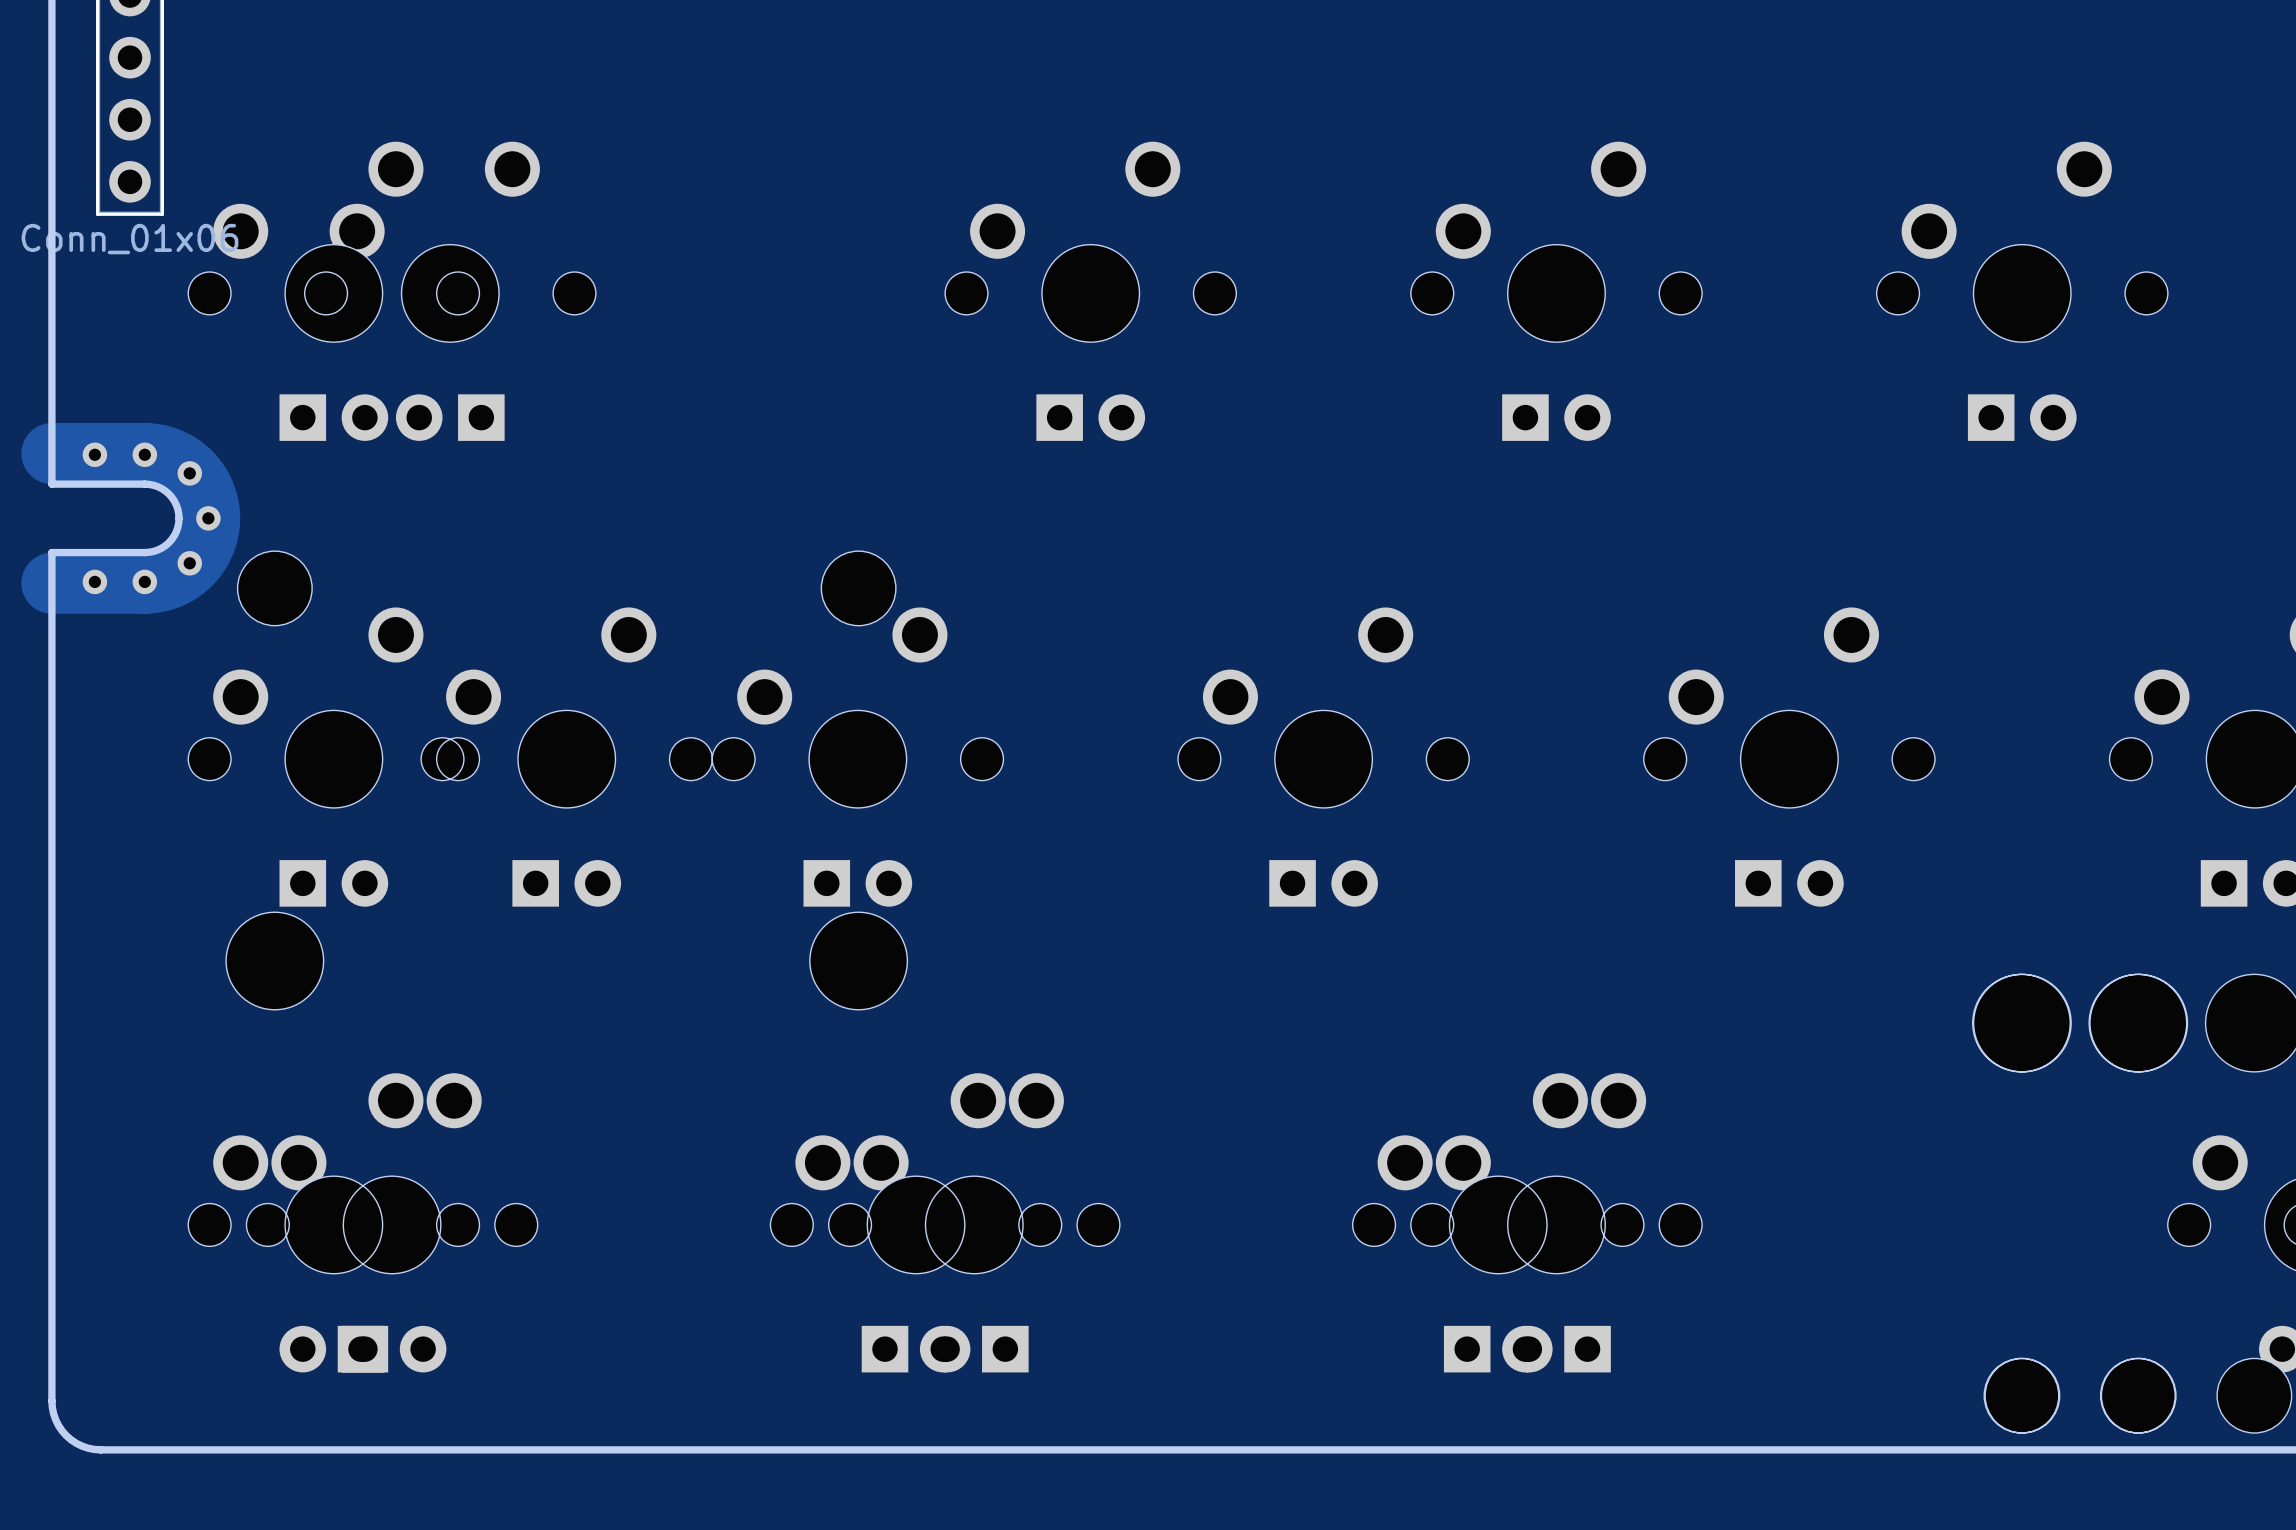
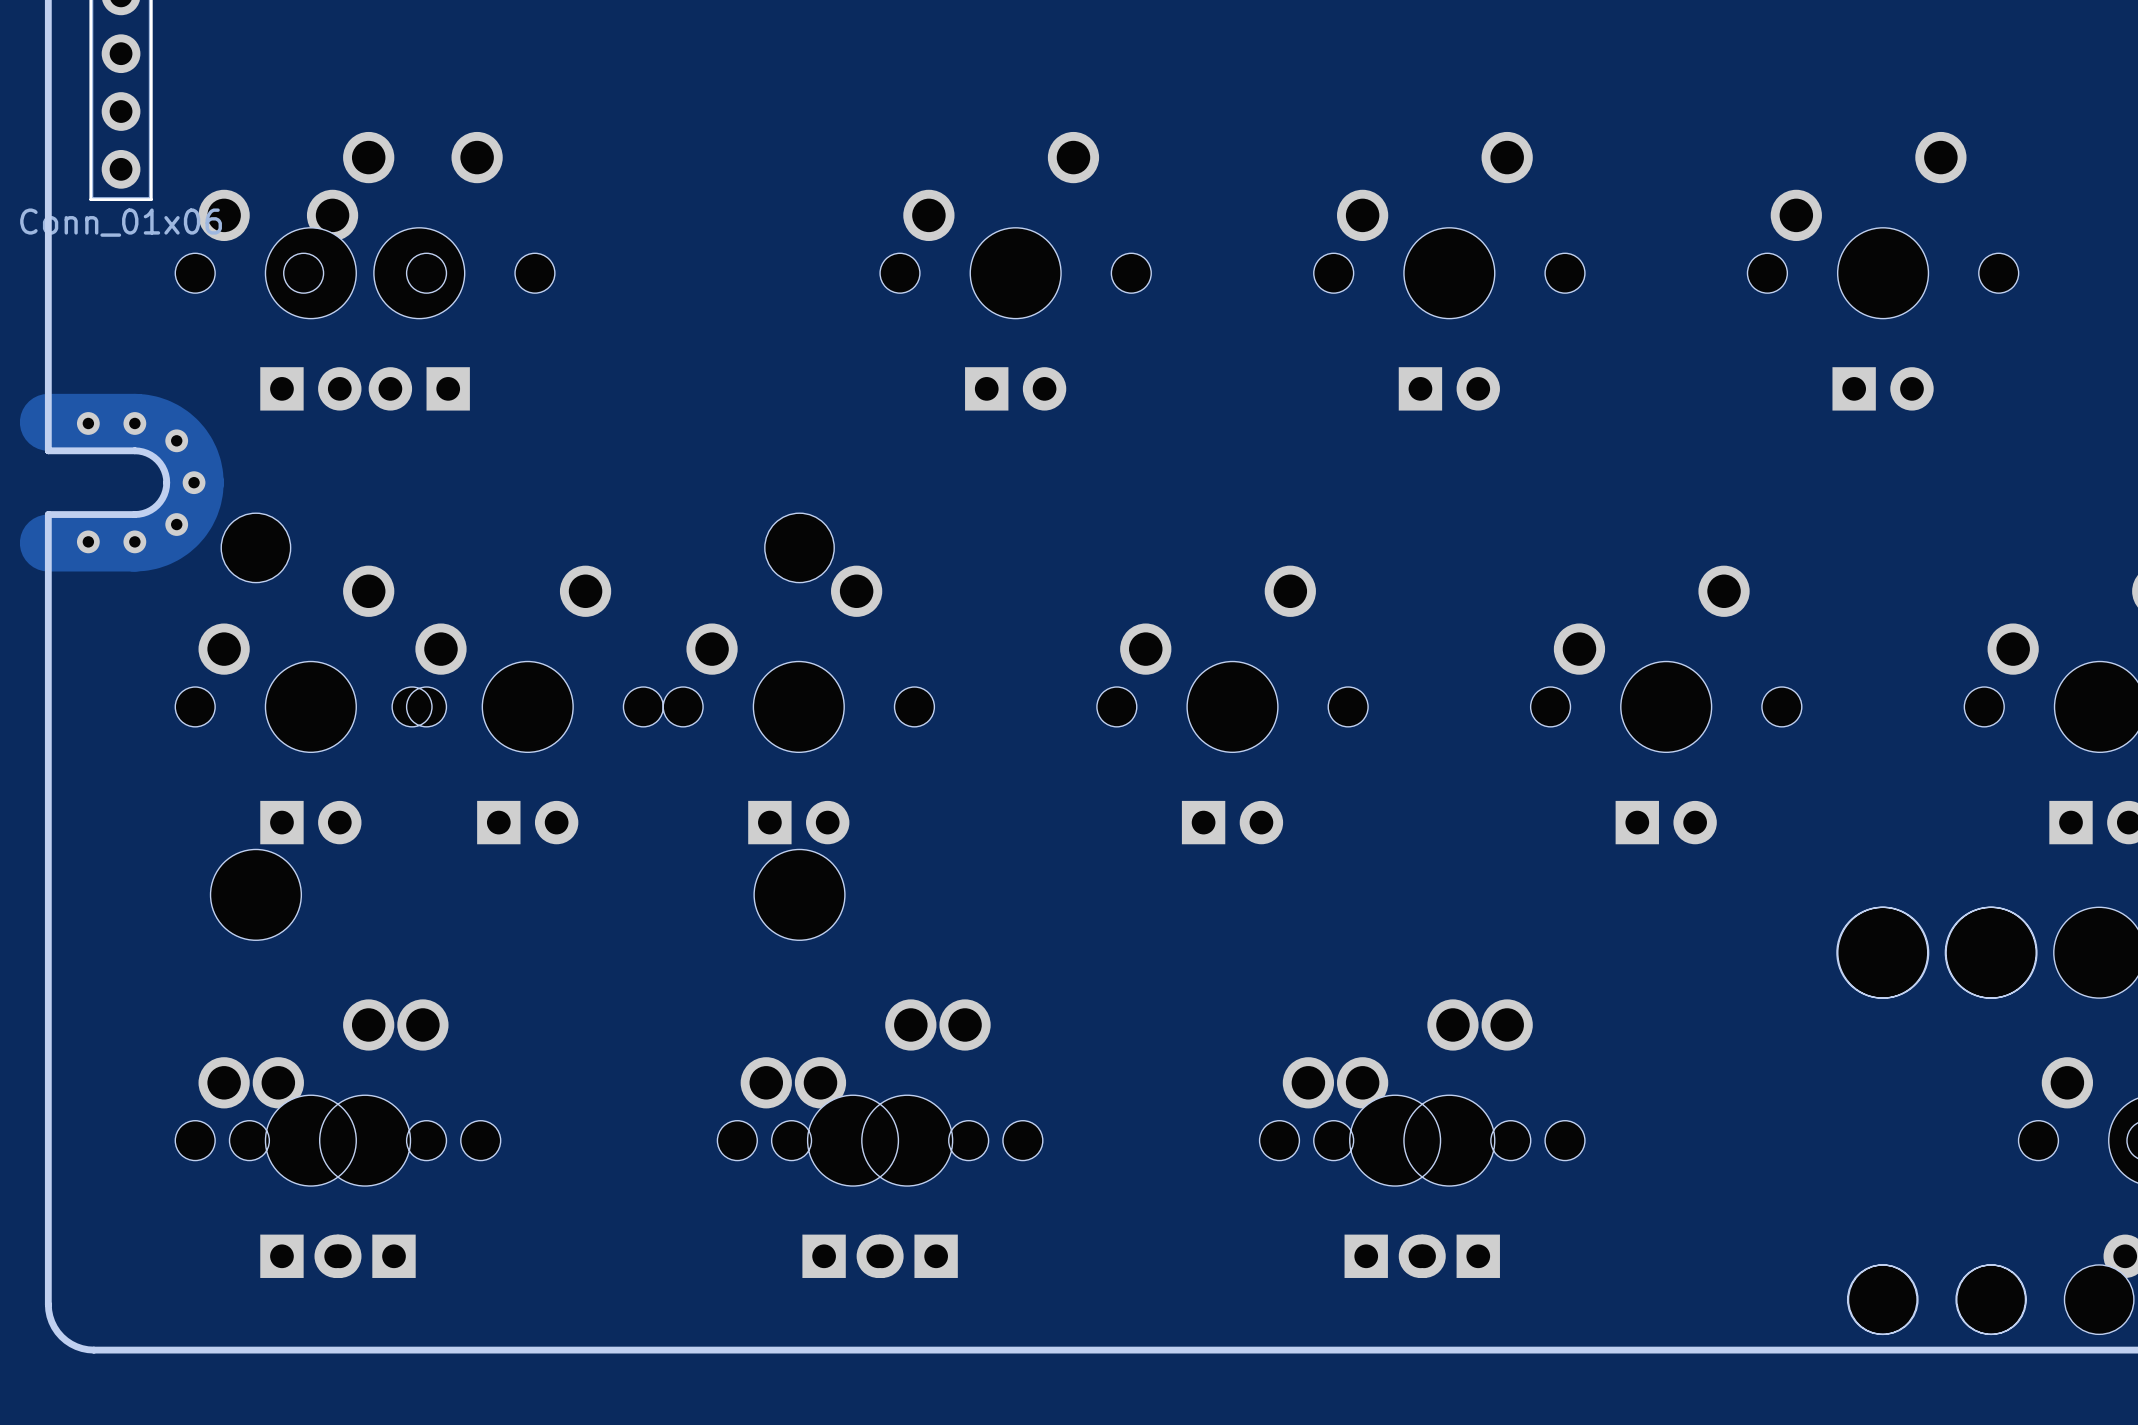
part footprint: [188, 1073, 480, 1373] -> [175, 999, 447, 1278]
part footprint: [246, 1073, 538, 1373] -> [229, 999, 501, 1278]

